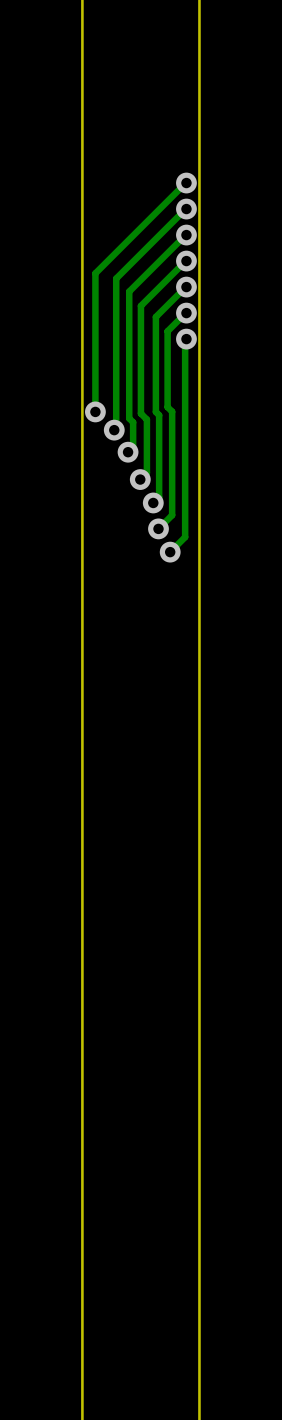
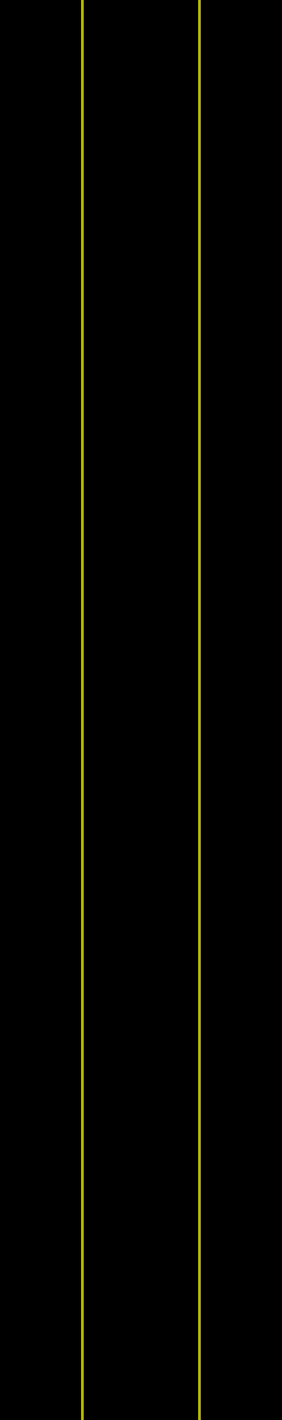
track: (186, 183) (95, 273) (95, 411) -> none
via: (186, 183) -> none
track: (186, 209) (116, 278) (116, 428) (114, 430) -> none
via: (186, 209) -> none
track: (186, 235) (129, 291) (129, 418) (133, 422) (133, 447) (128, 452) -> none
via: (186, 235) -> none
track: (186, 261) (140, 305) (140, 413) (146, 419) (146, 472) (140, 479) -> none
via: (186, 261) -> none
track: (186, 287) (155, 316) (155, 411) (159, 415) (159, 497) (153, 502) -> none
via: (186, 287) -> none
track: (186, 313) (167, 331) (167, 407) (172, 411) (172, 515) (158, 528) -> none
via: (186, 313) -> none
track: (186, 339) (185, 537) (170, 552) -> none
via: (186, 339) -> none
via: (95, 411) -> none
via: (114, 430) -> none
via: (128, 452) -> none
via: (140, 479) -> none
via: (153, 502) -> none
via: (158, 528) -> none
via: (170, 552) -> none

